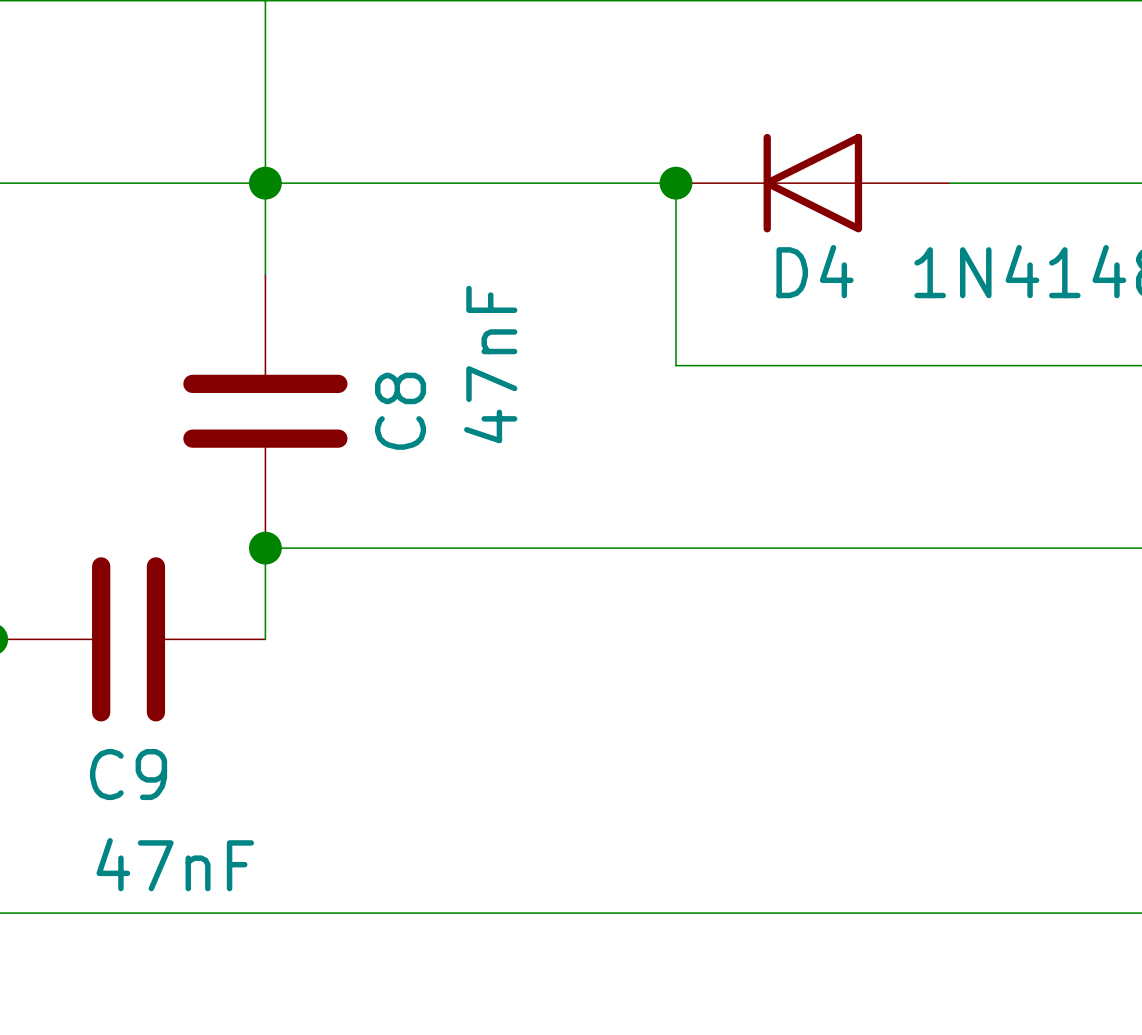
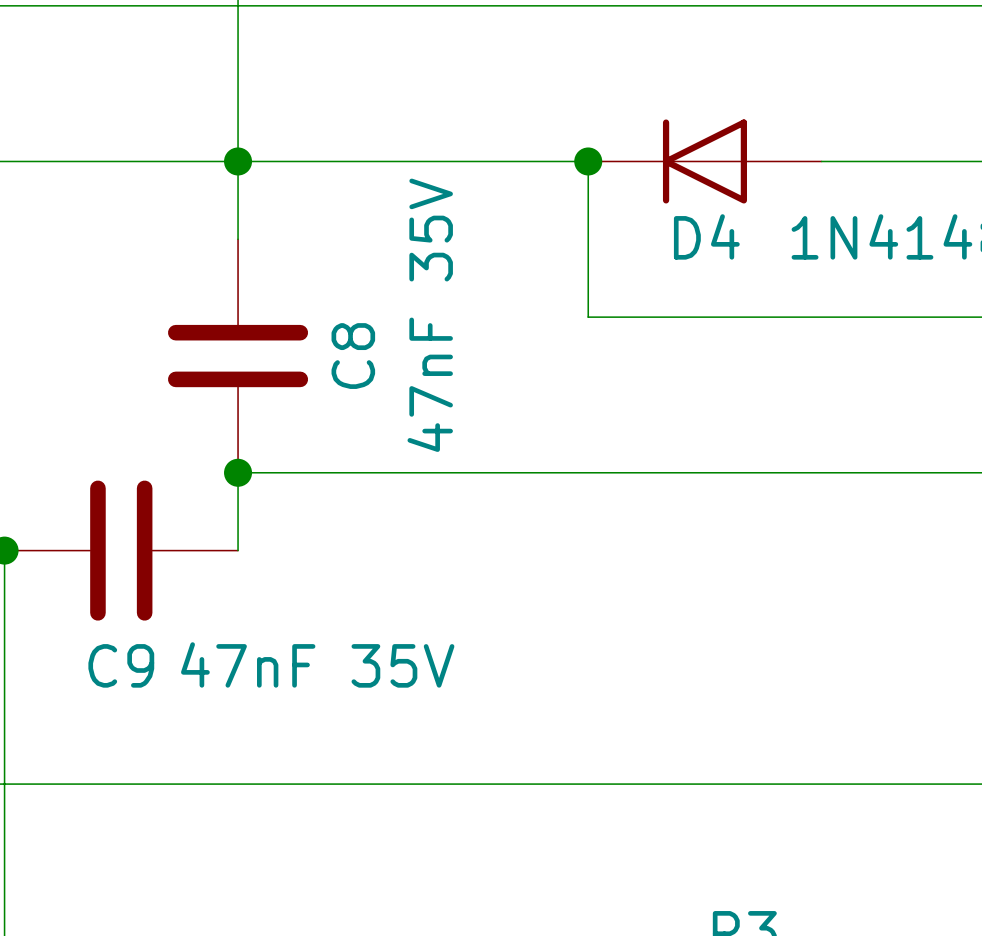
C8 value: 47nF (490, 364) -> 47nF 35V (430, 315)
C9 value: 47nF (175, 864) -> 47nF 35V (317, 664)

